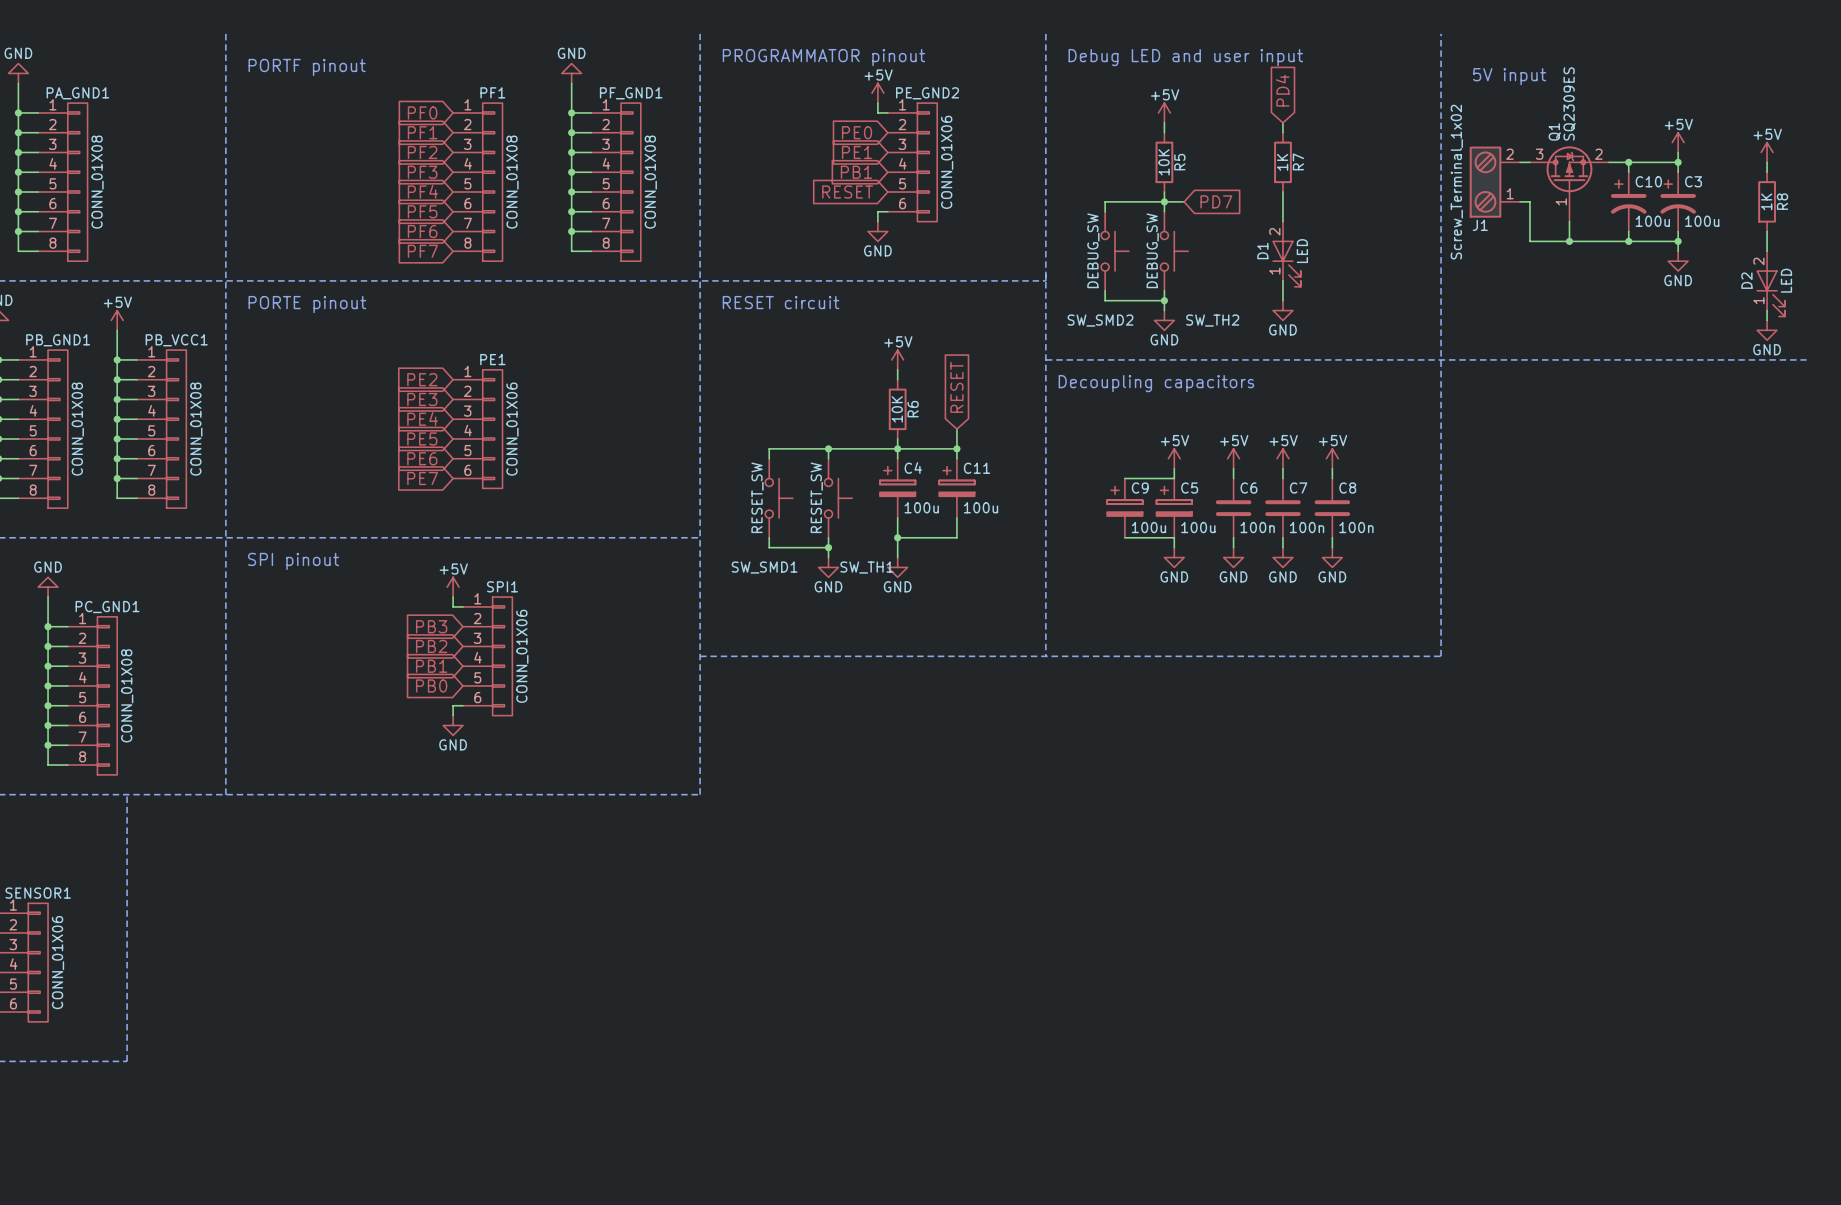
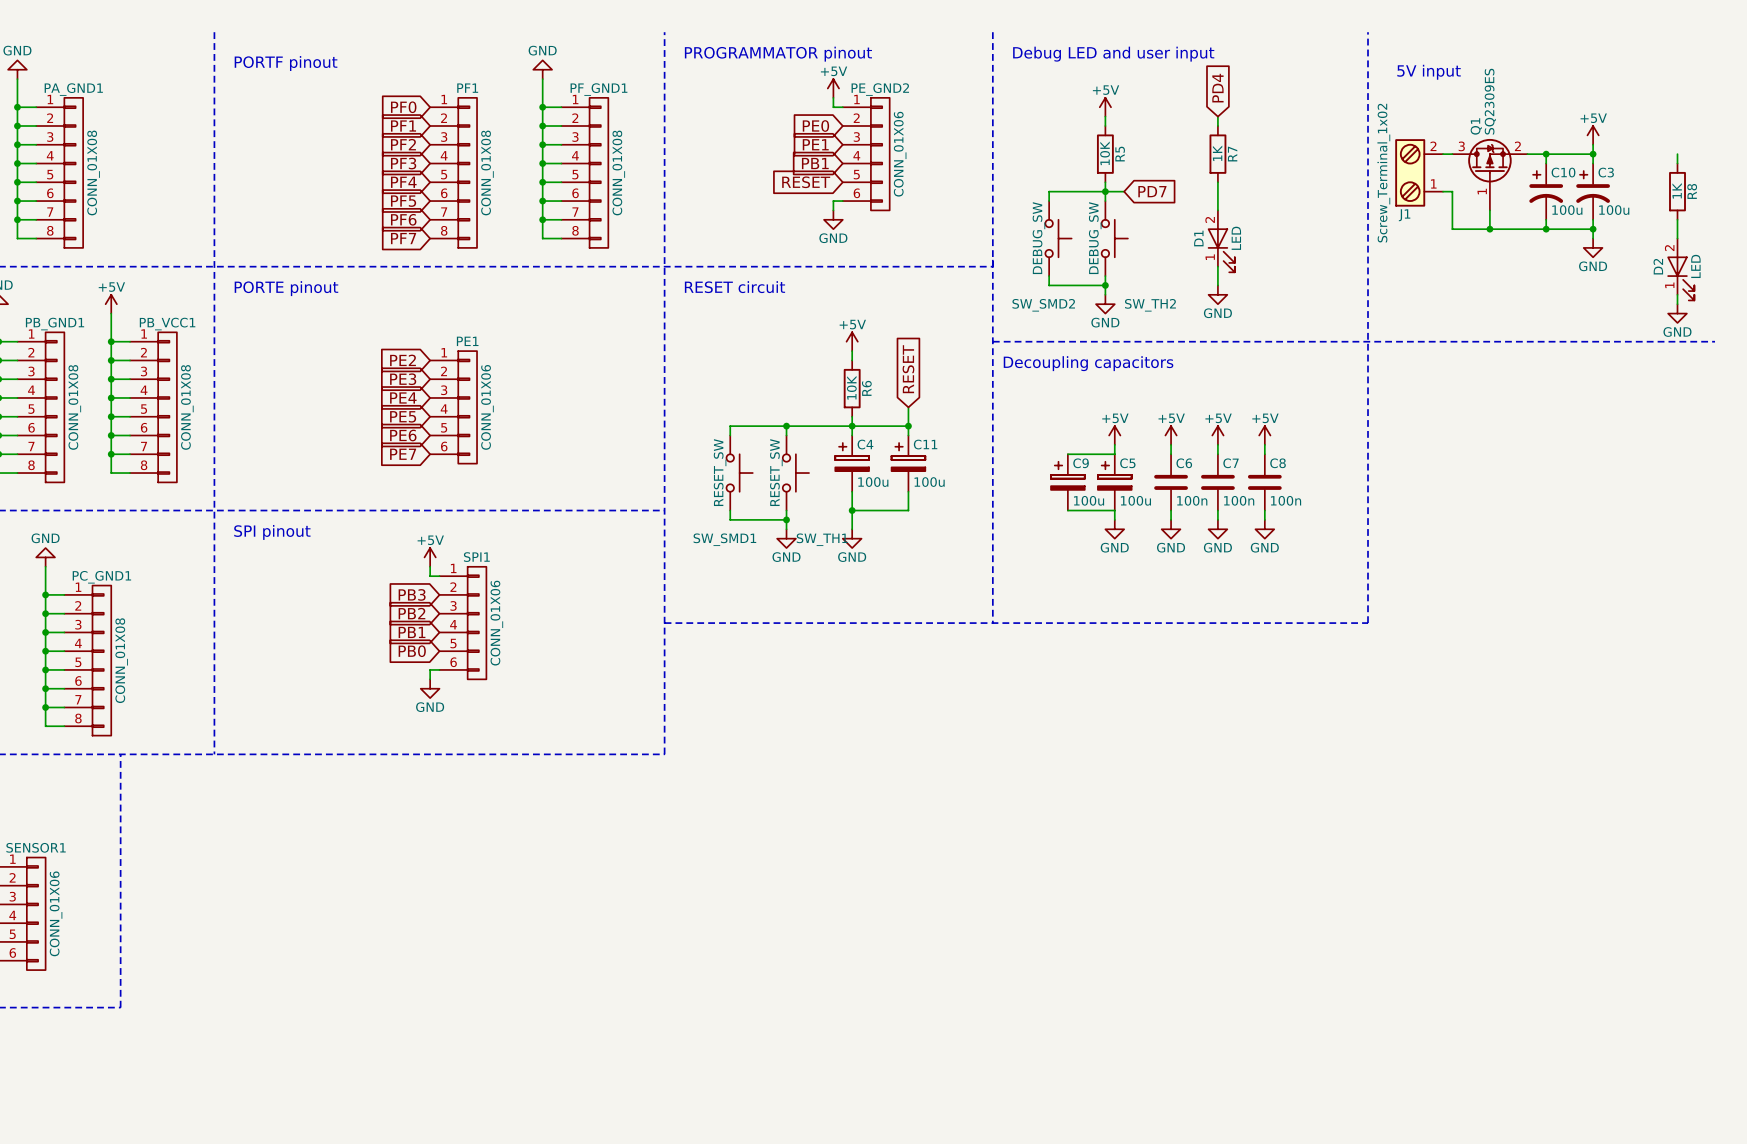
power symbol: +5V (1767, 152) -> none

